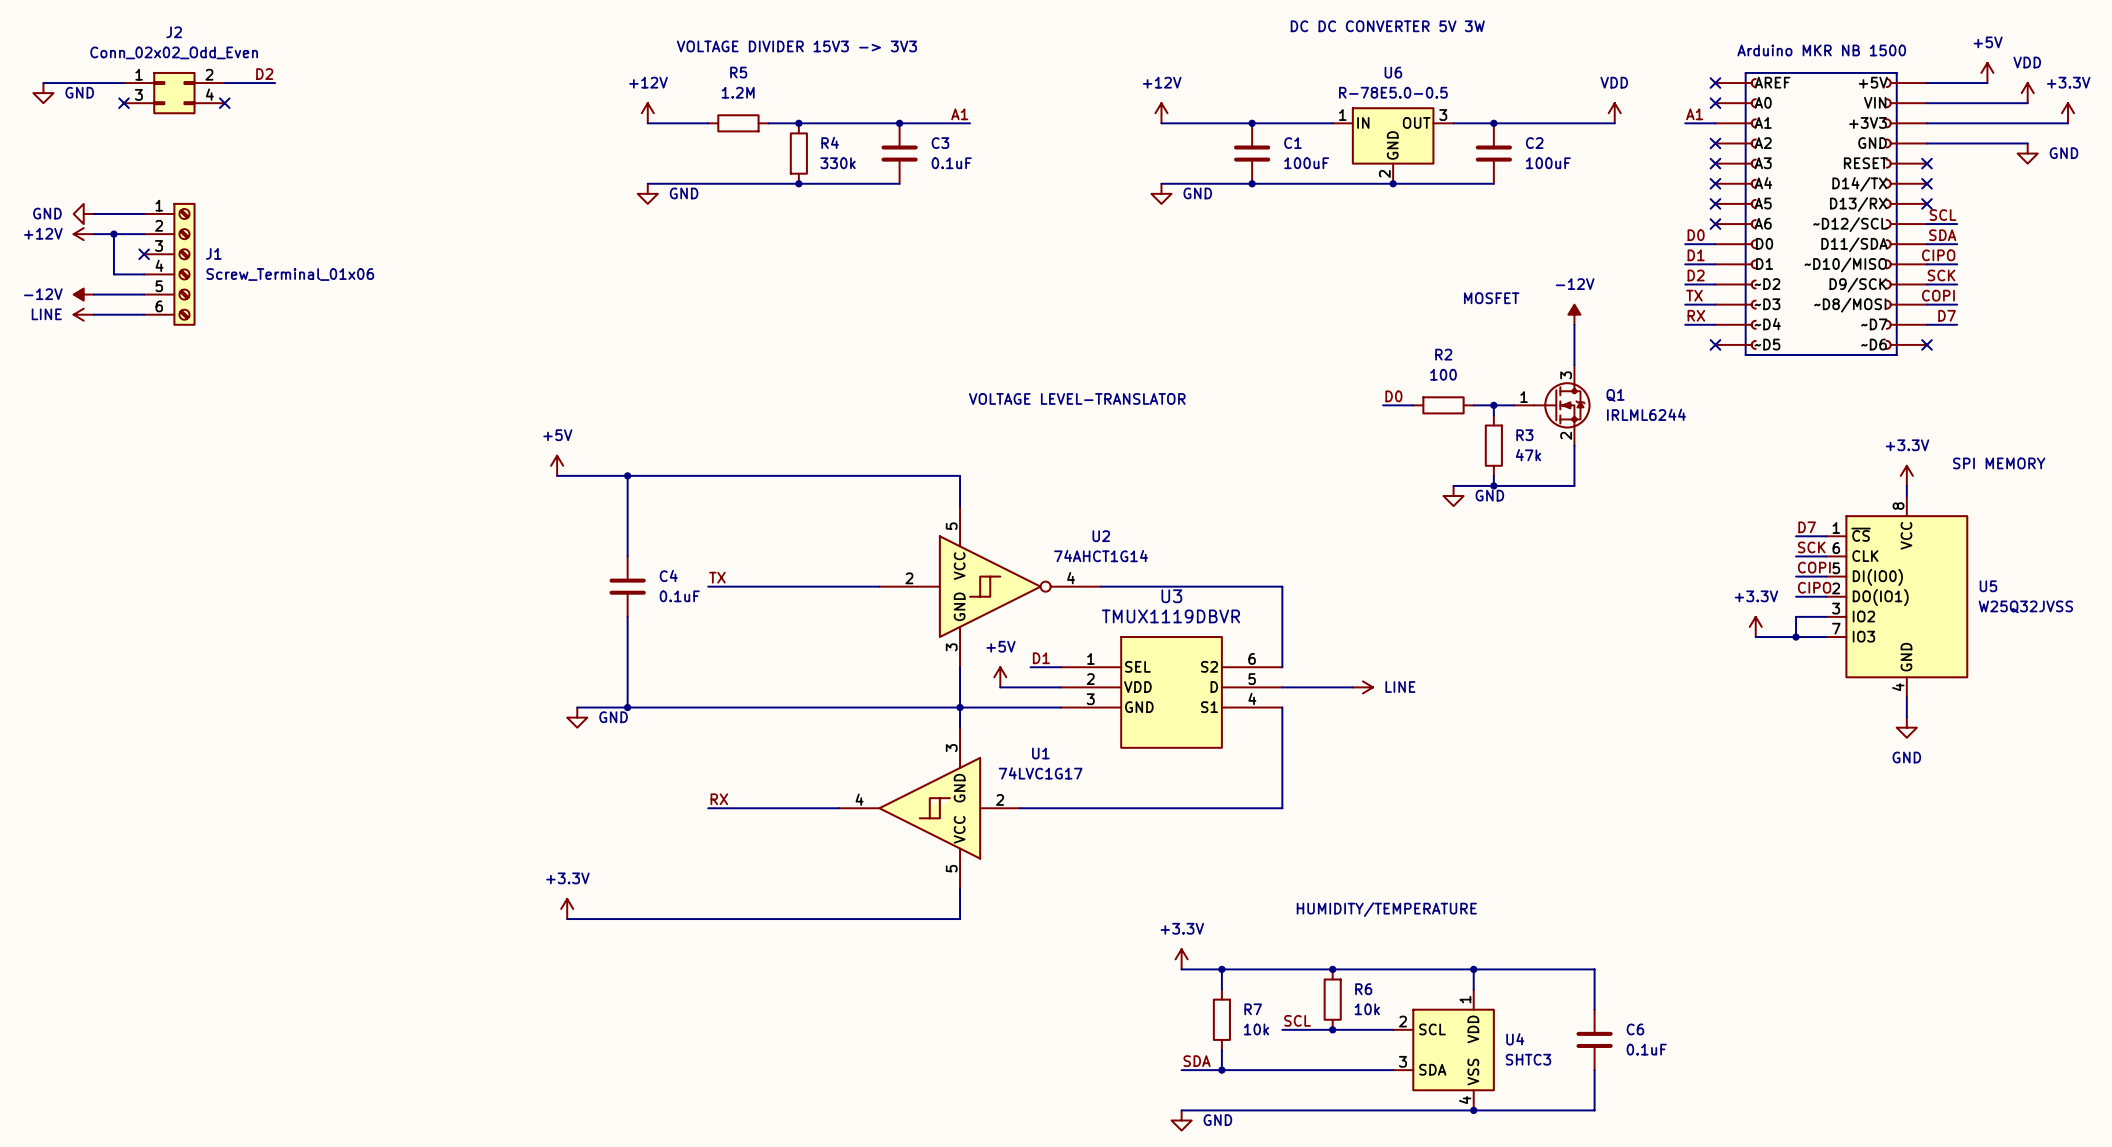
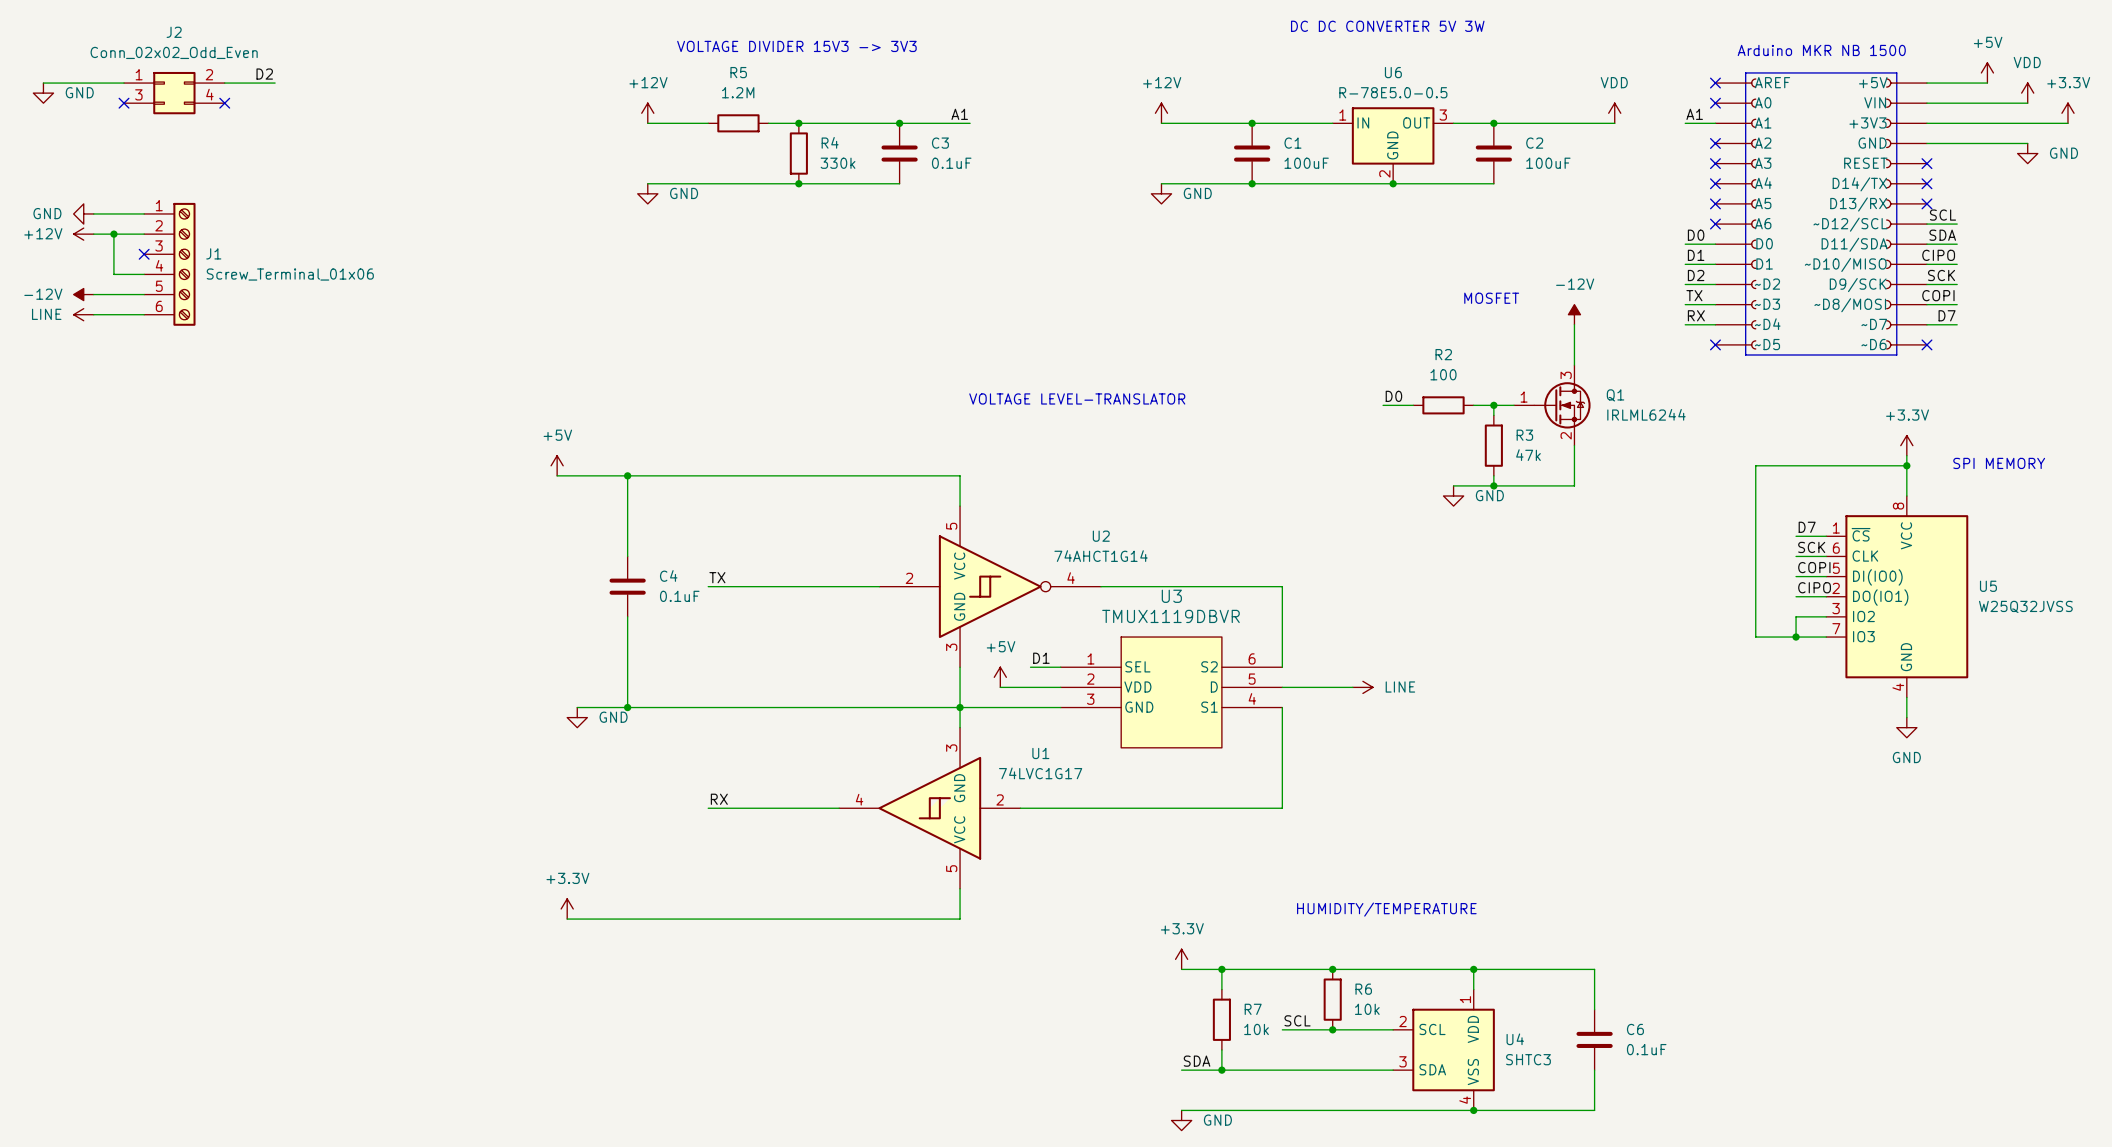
wire: none -> (1906, 465) (1755, 465) (1755, 637)
junction: none -> (1906, 465)
power symbol position: +3.3V (1906, 475) -> +3.3V (1906, 445)
power symbol: +3.3V (1755, 626) -> none

